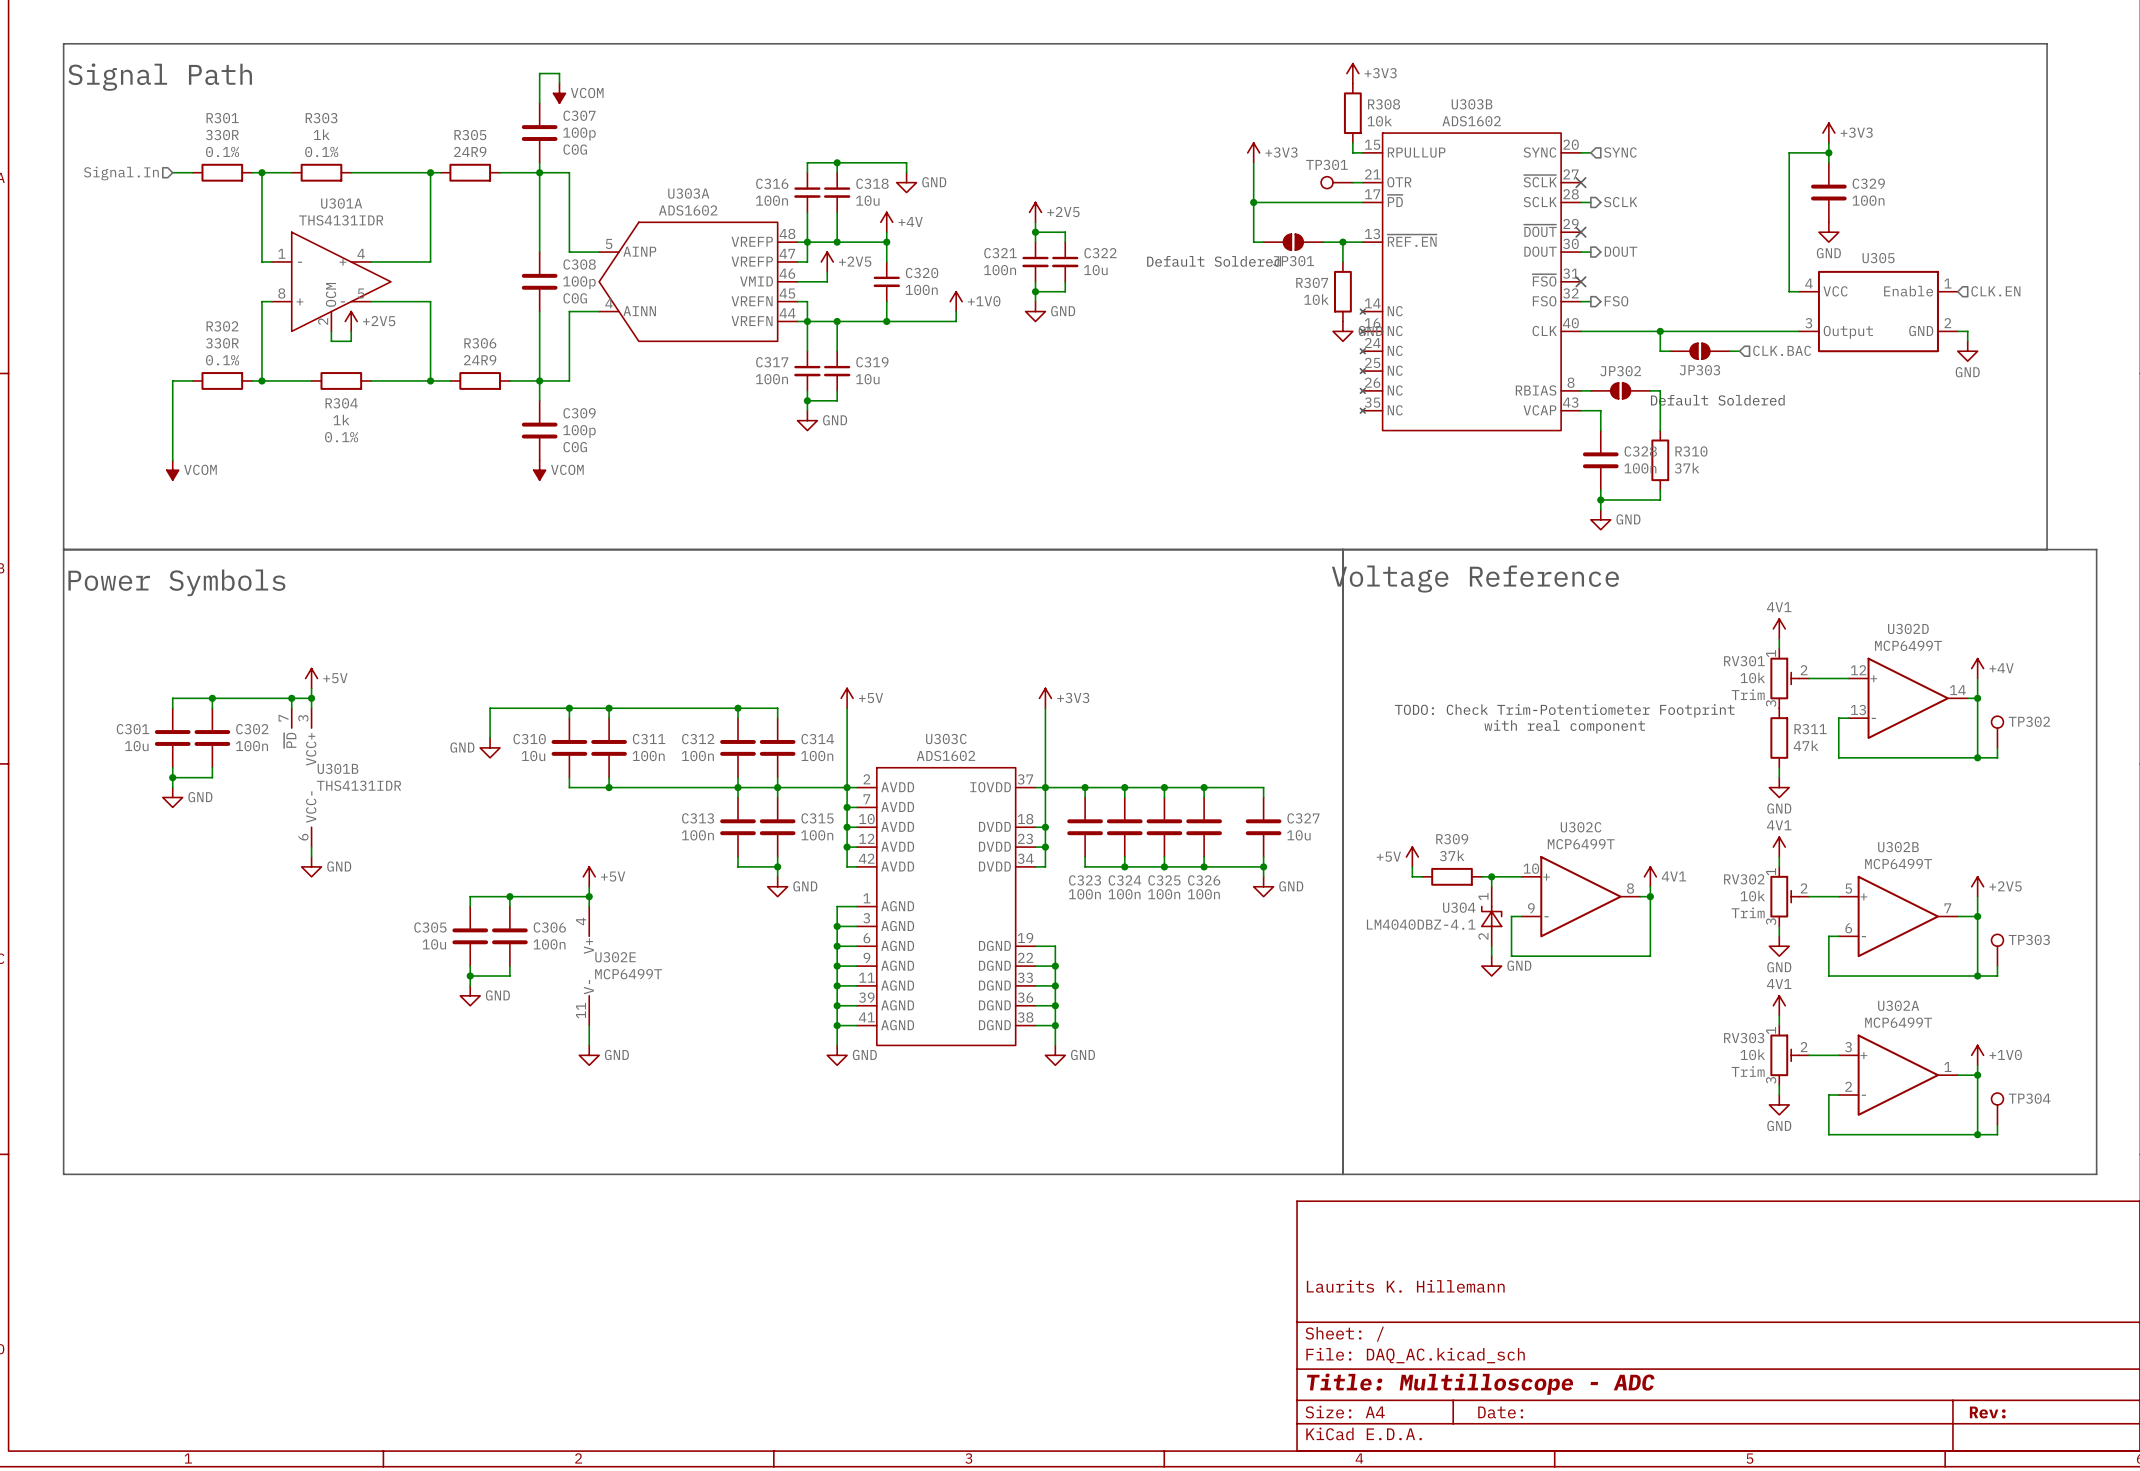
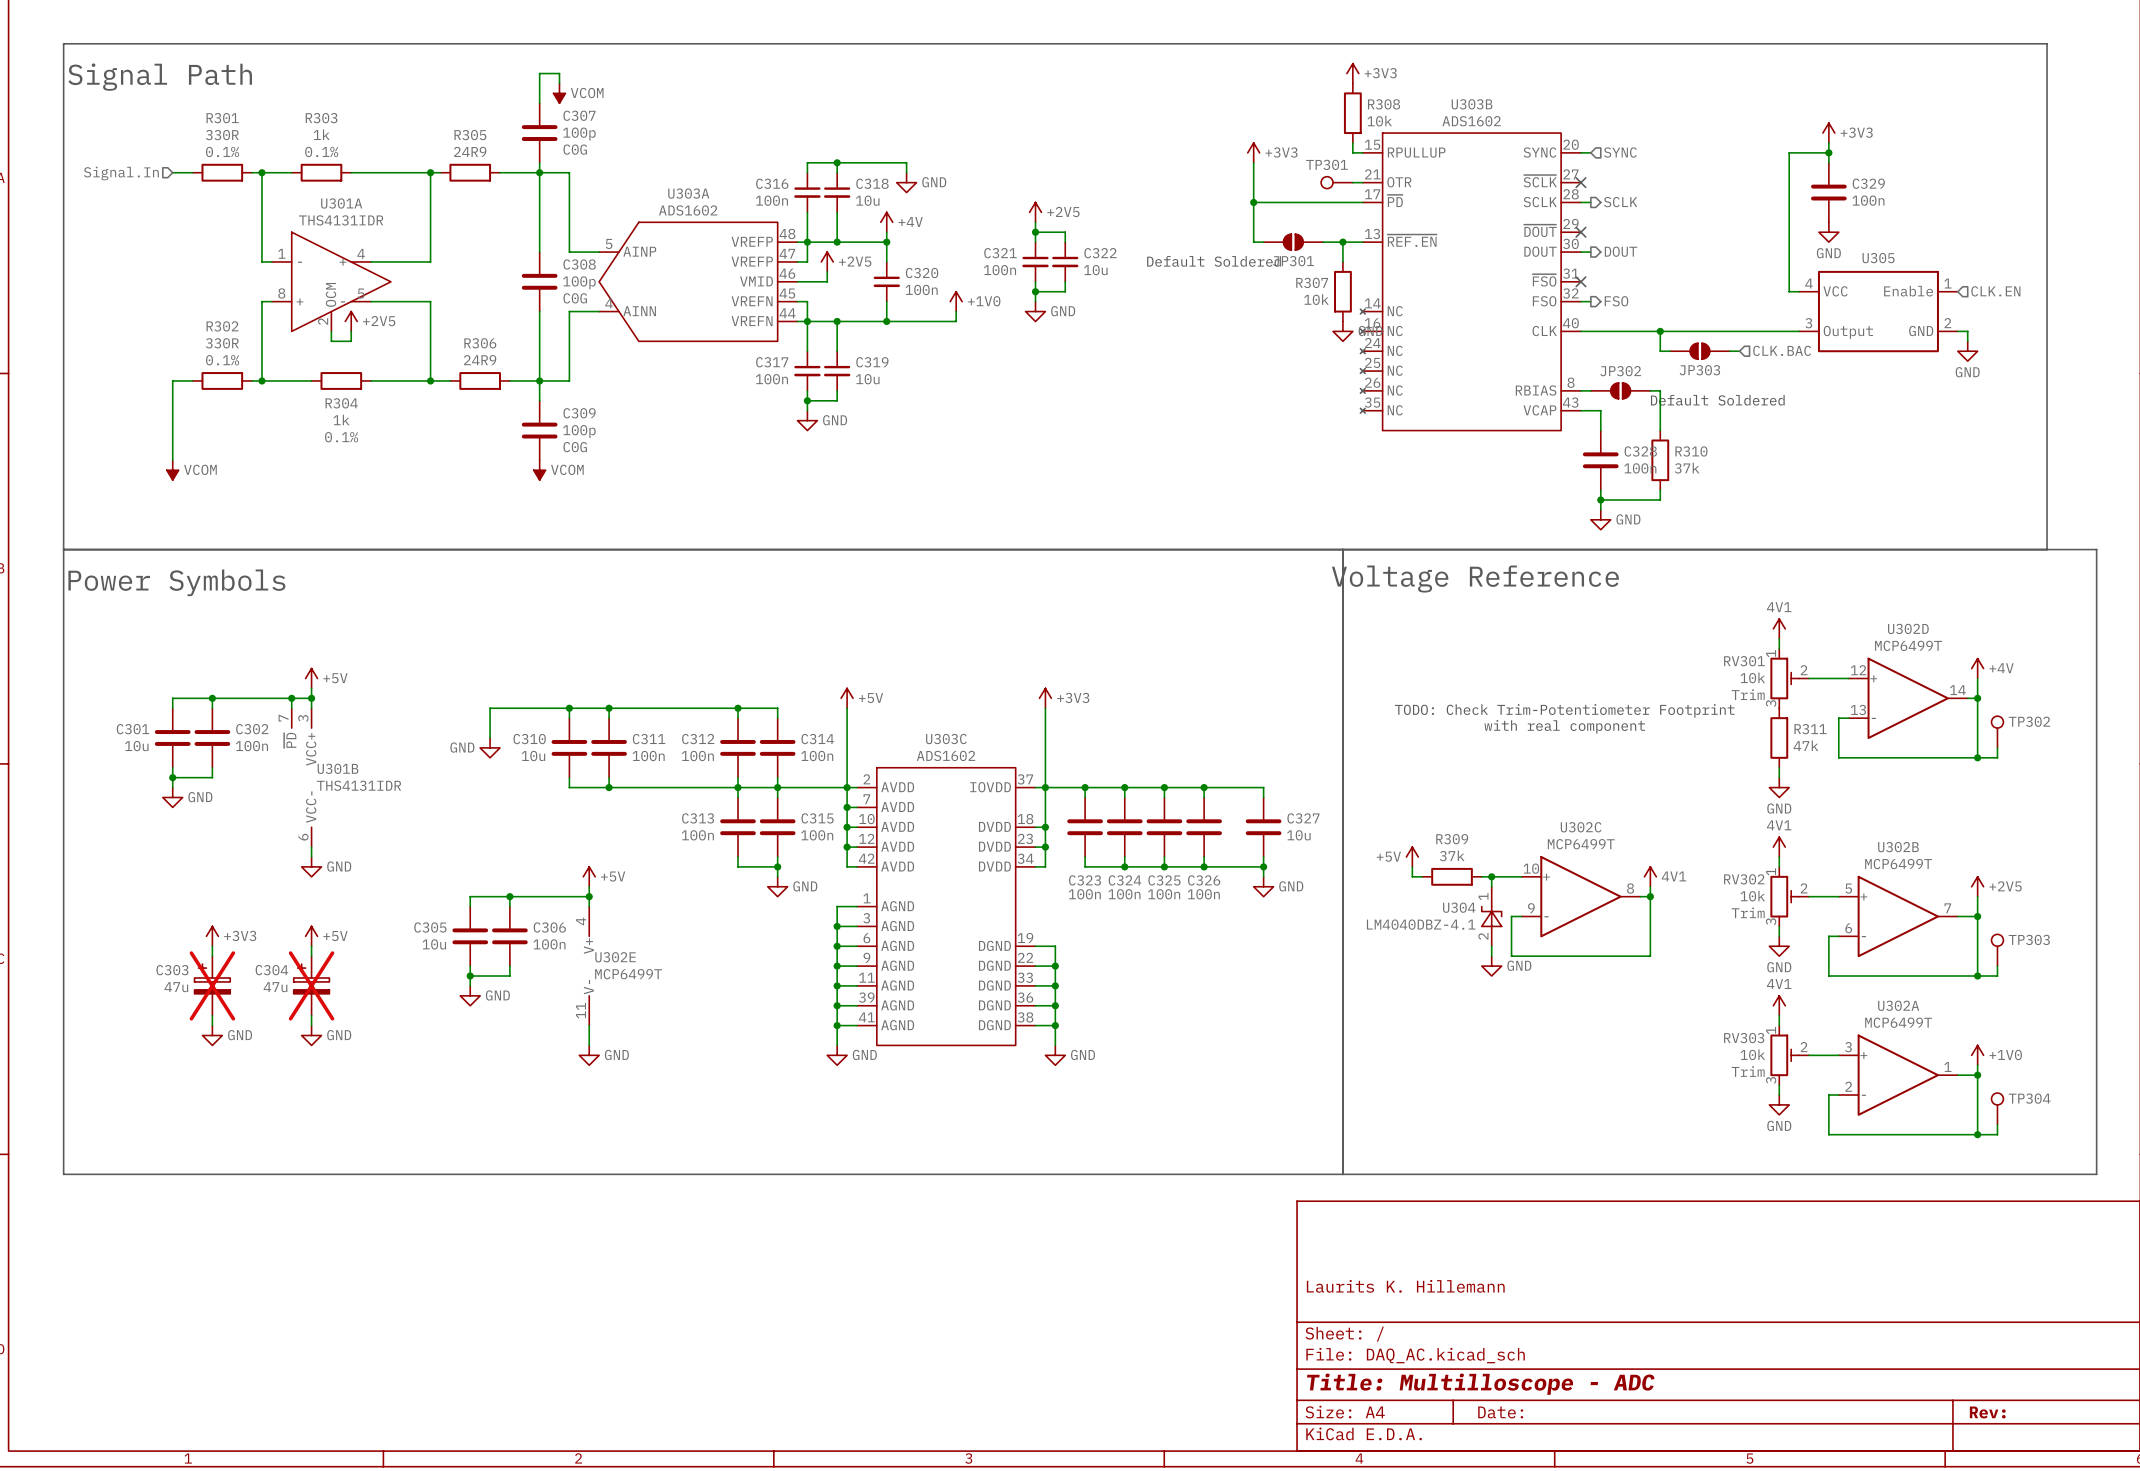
power symbol: none -> +3V3 (212, 936)
power symbol: none -> +5V (311, 936)
wire: none -> (212, 946) (212, 956)
wire: none -> (311, 946) (311, 956)
C303: none -> 47u (212, 985)
C304: none -> 47u (311, 985)
wire: none -> (212, 1015) (212, 1025)
wire: none -> (311, 1015) (311, 1025)
power symbol: none -> GND (212, 1035)
power symbol: none -> GND (311, 1035)

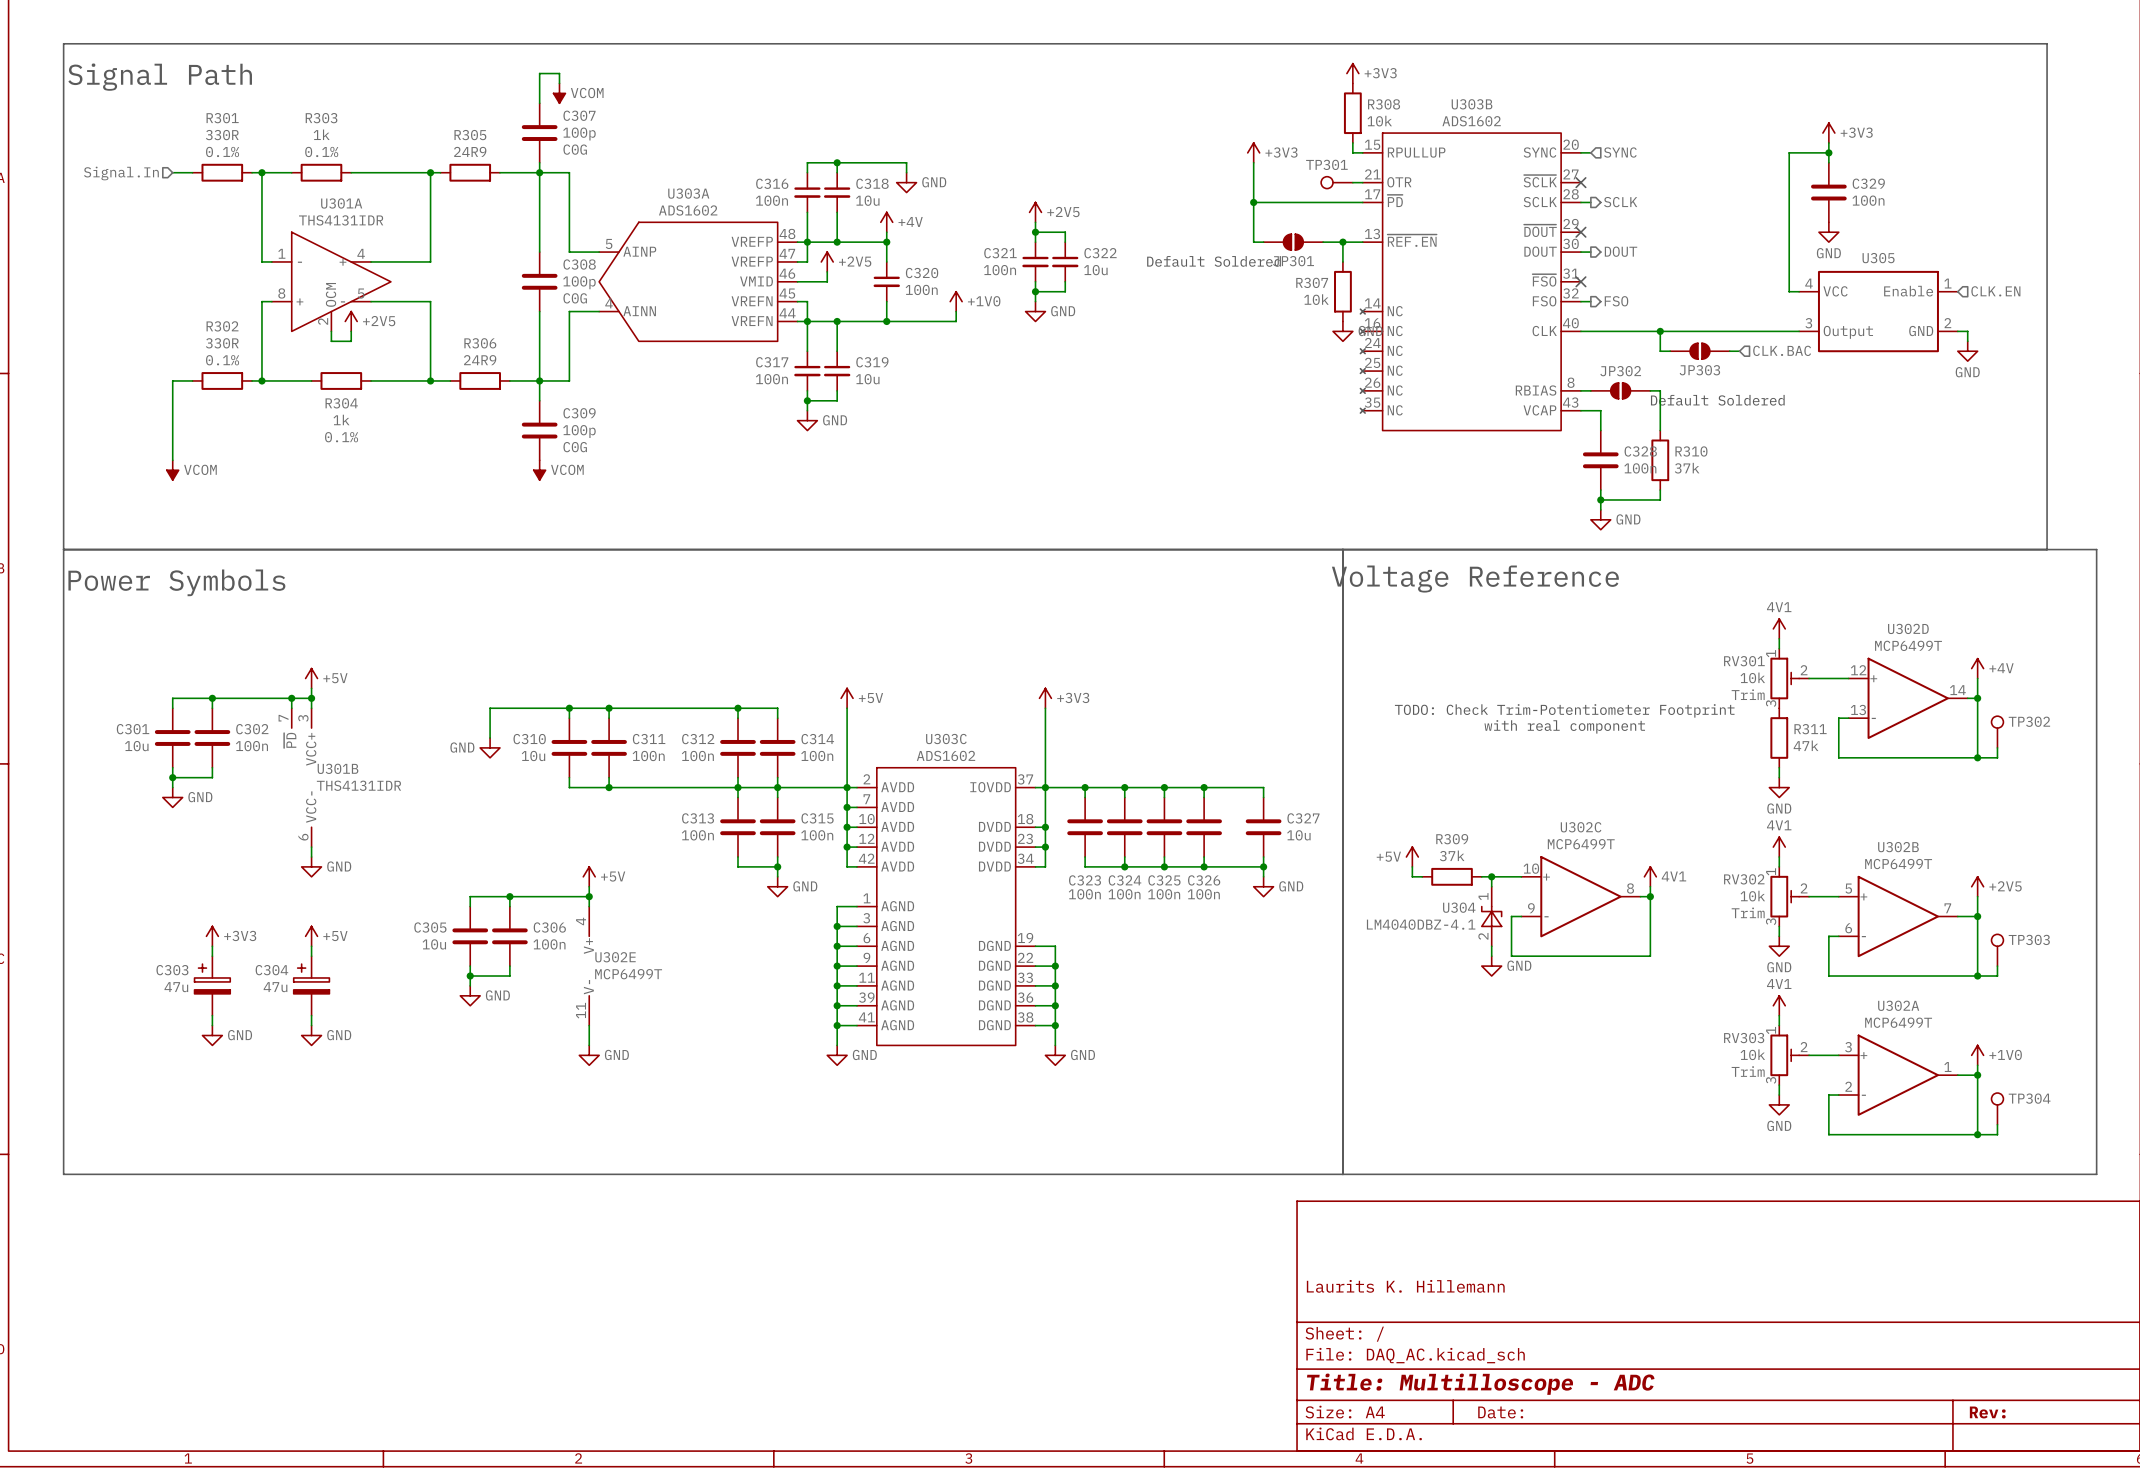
C303 do-not-place cross: (212, 985) -> none
C304 do-not-place cross: (311, 985) -> none

